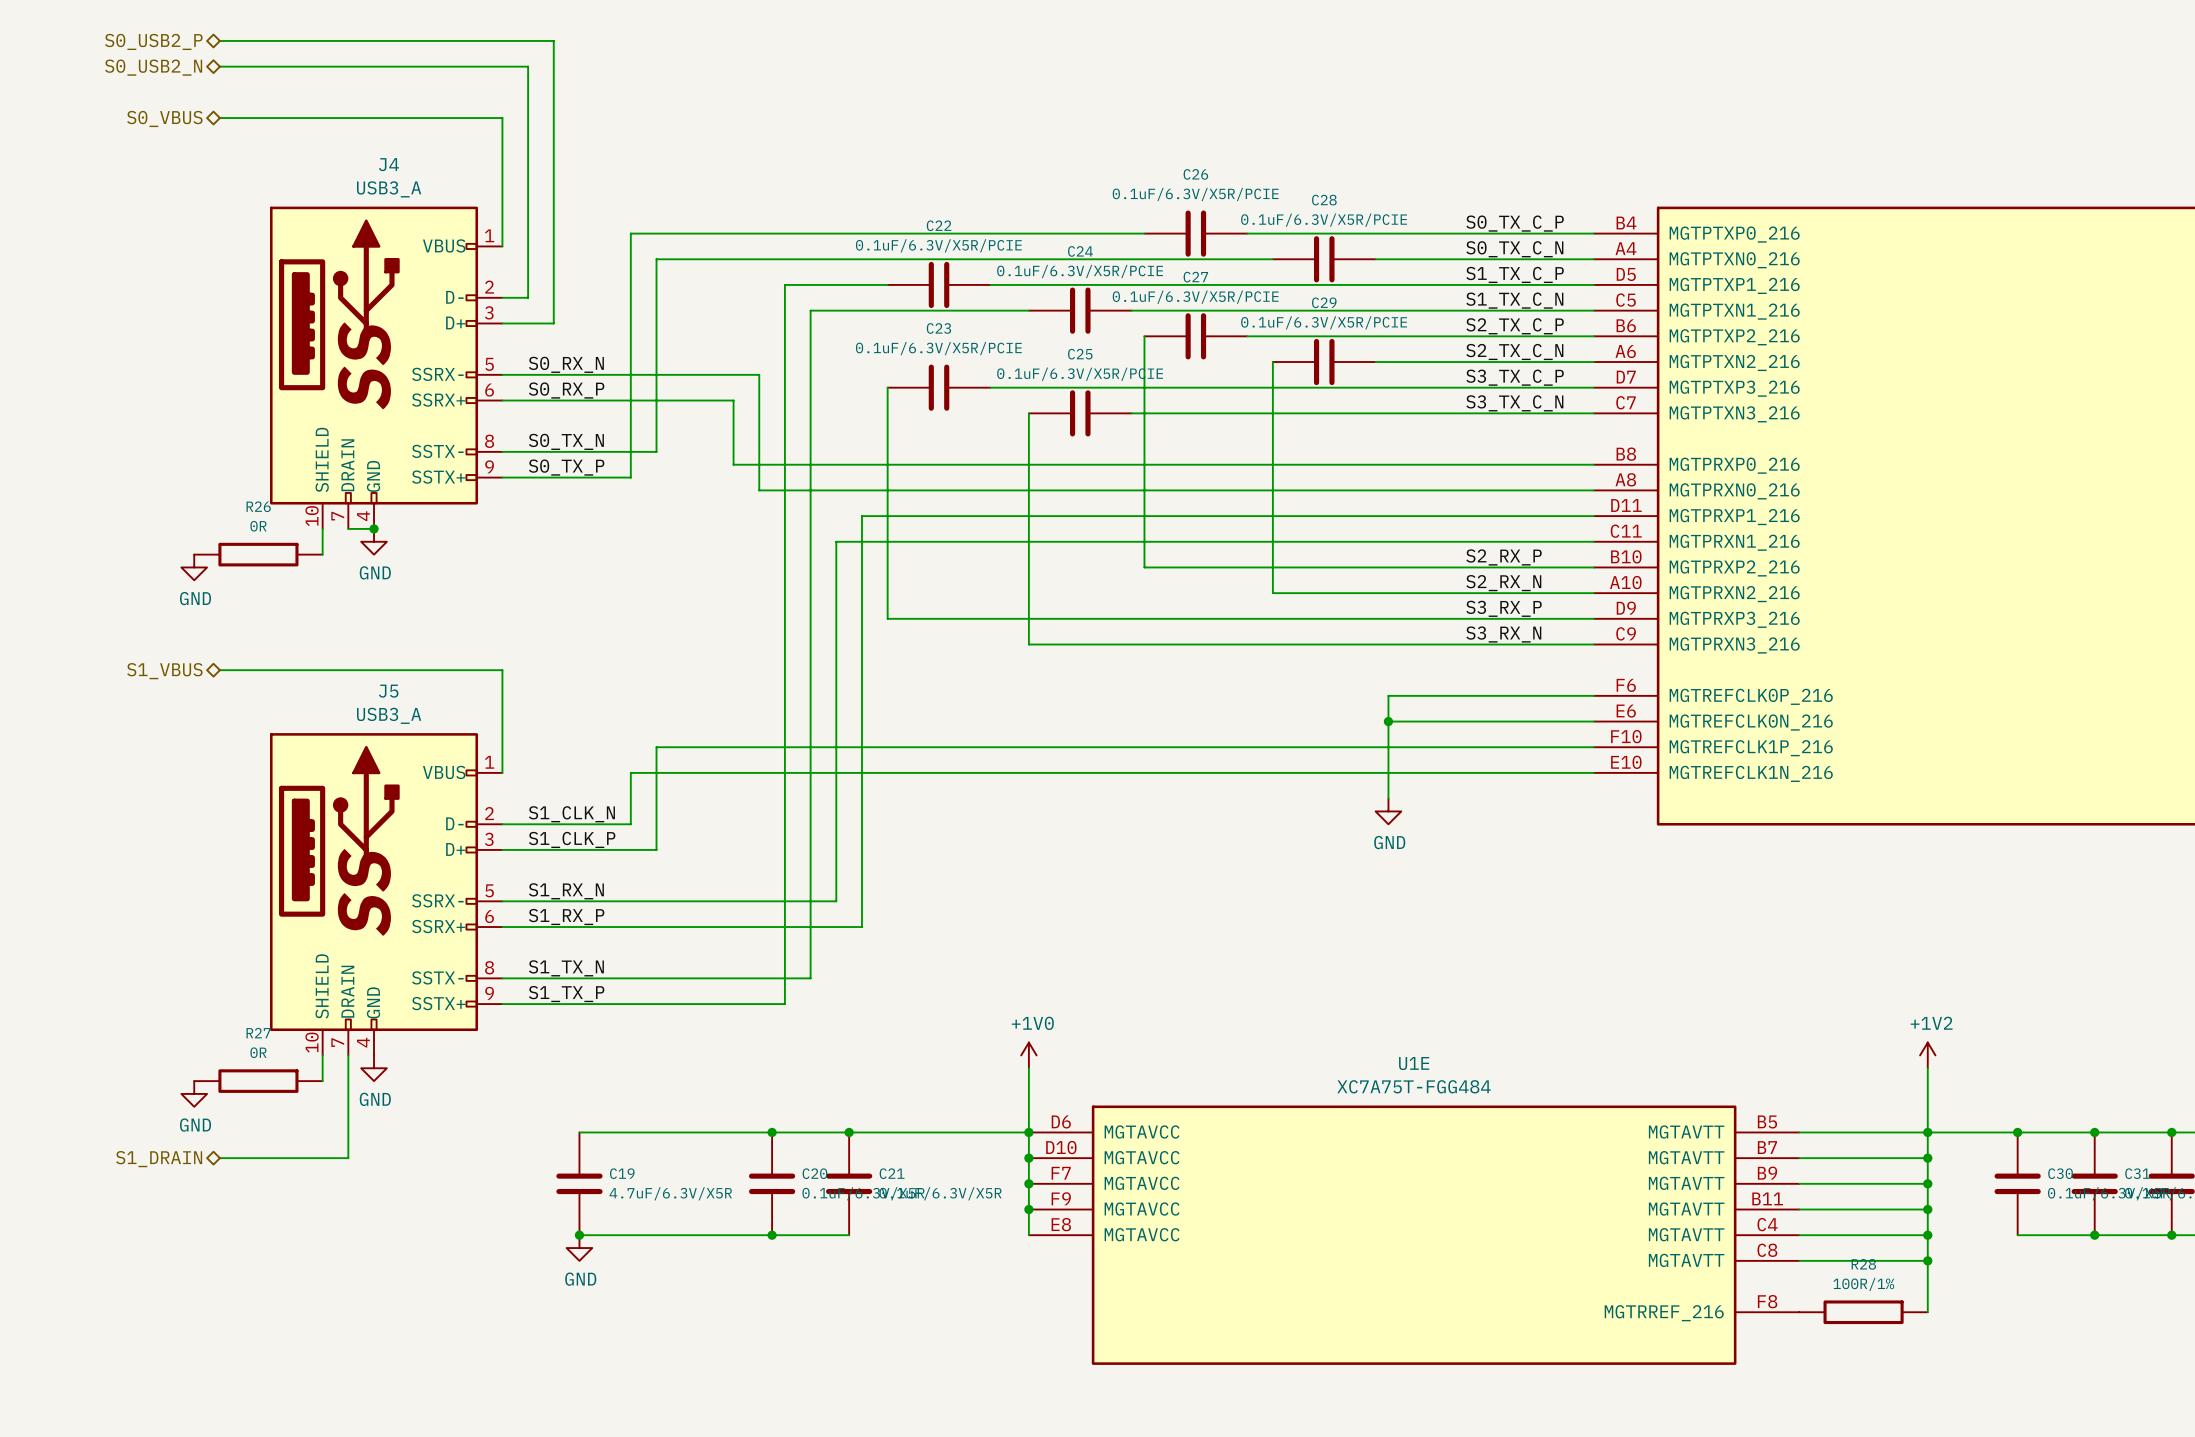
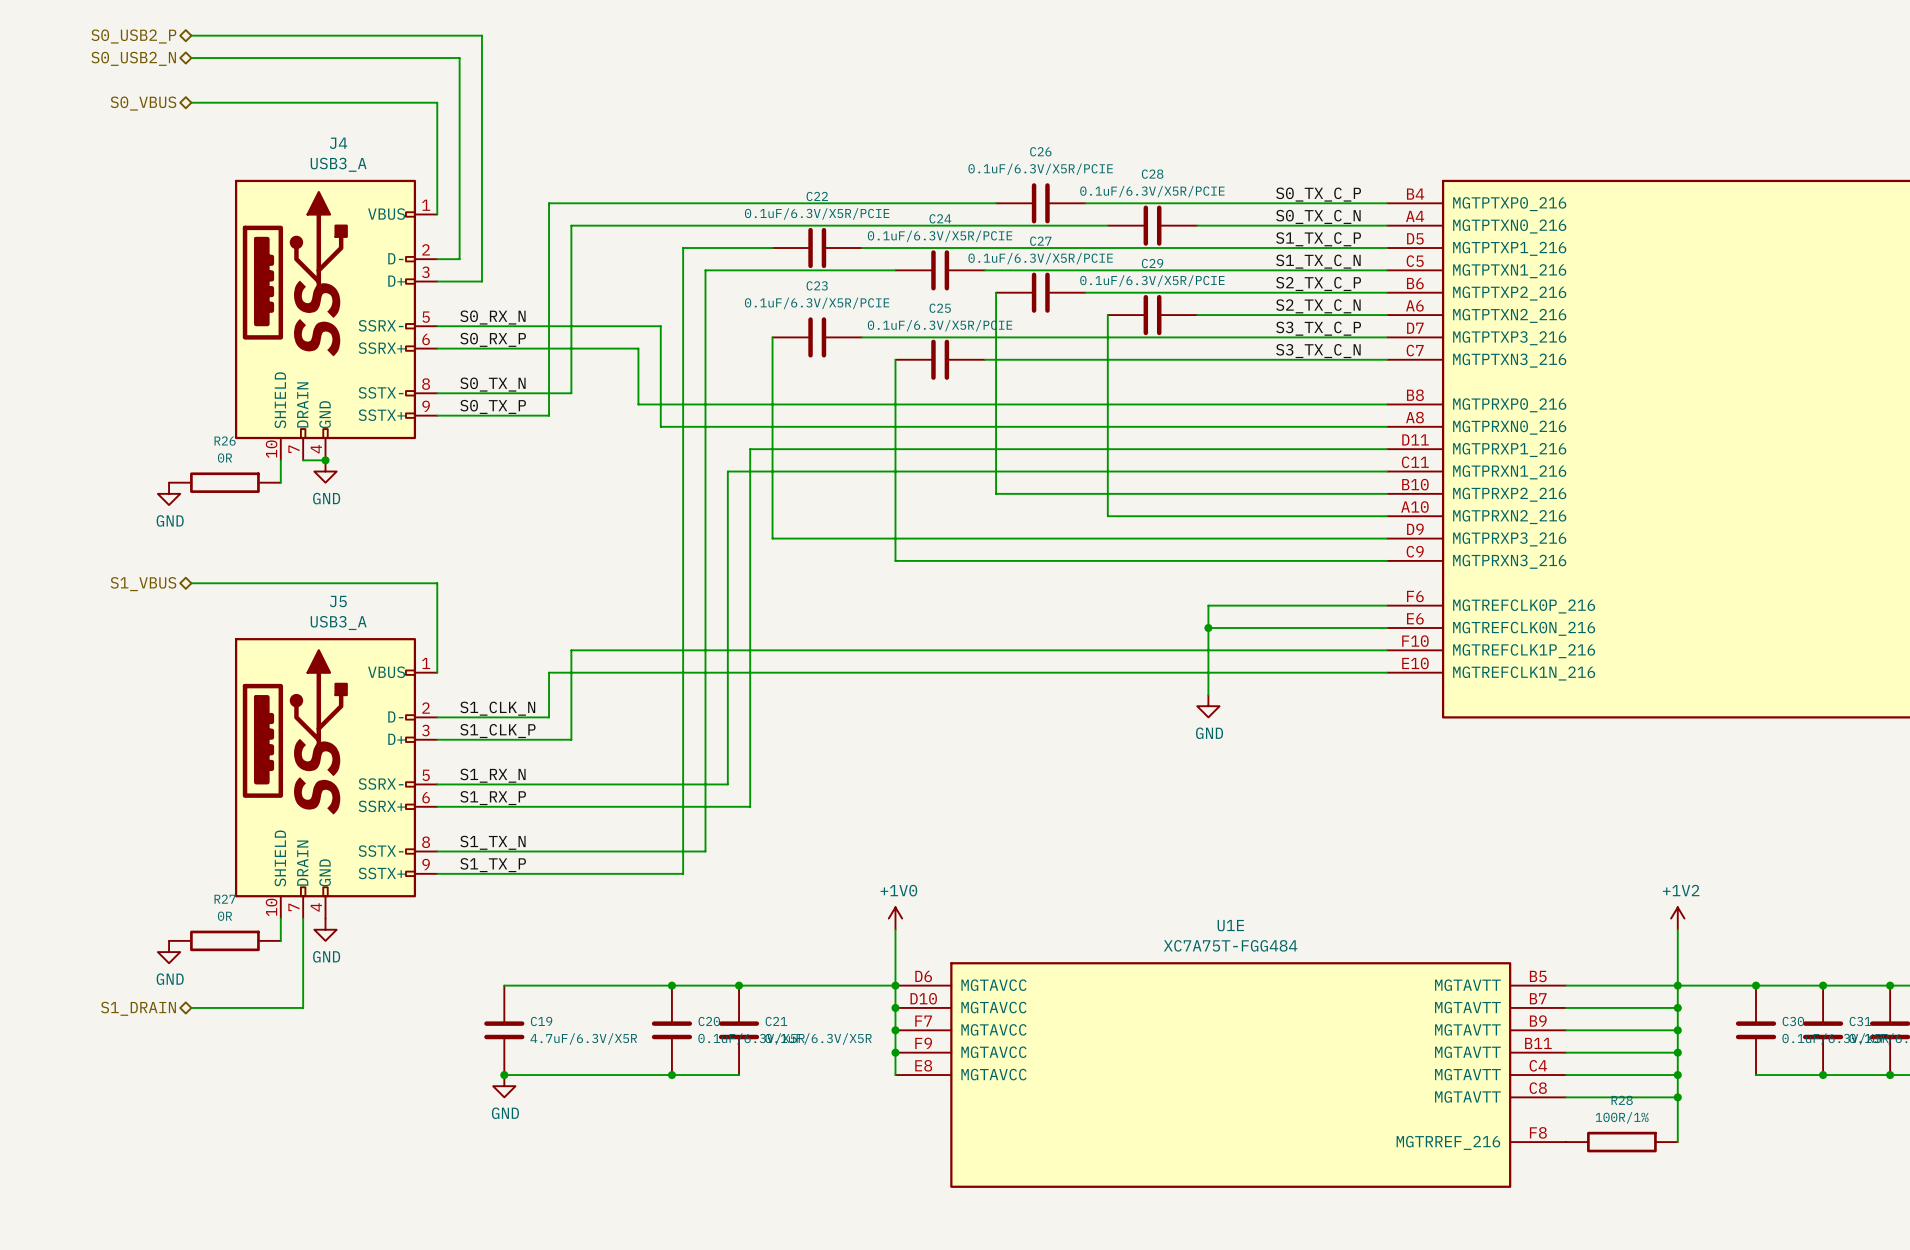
label: S2_RX_P (1504, 557) -> none
label: S2_RX_N (1503, 583) -> none
label: S3_RX_P (1504, 608) -> none
label: S3_RX_N (1503, 634) -> none

